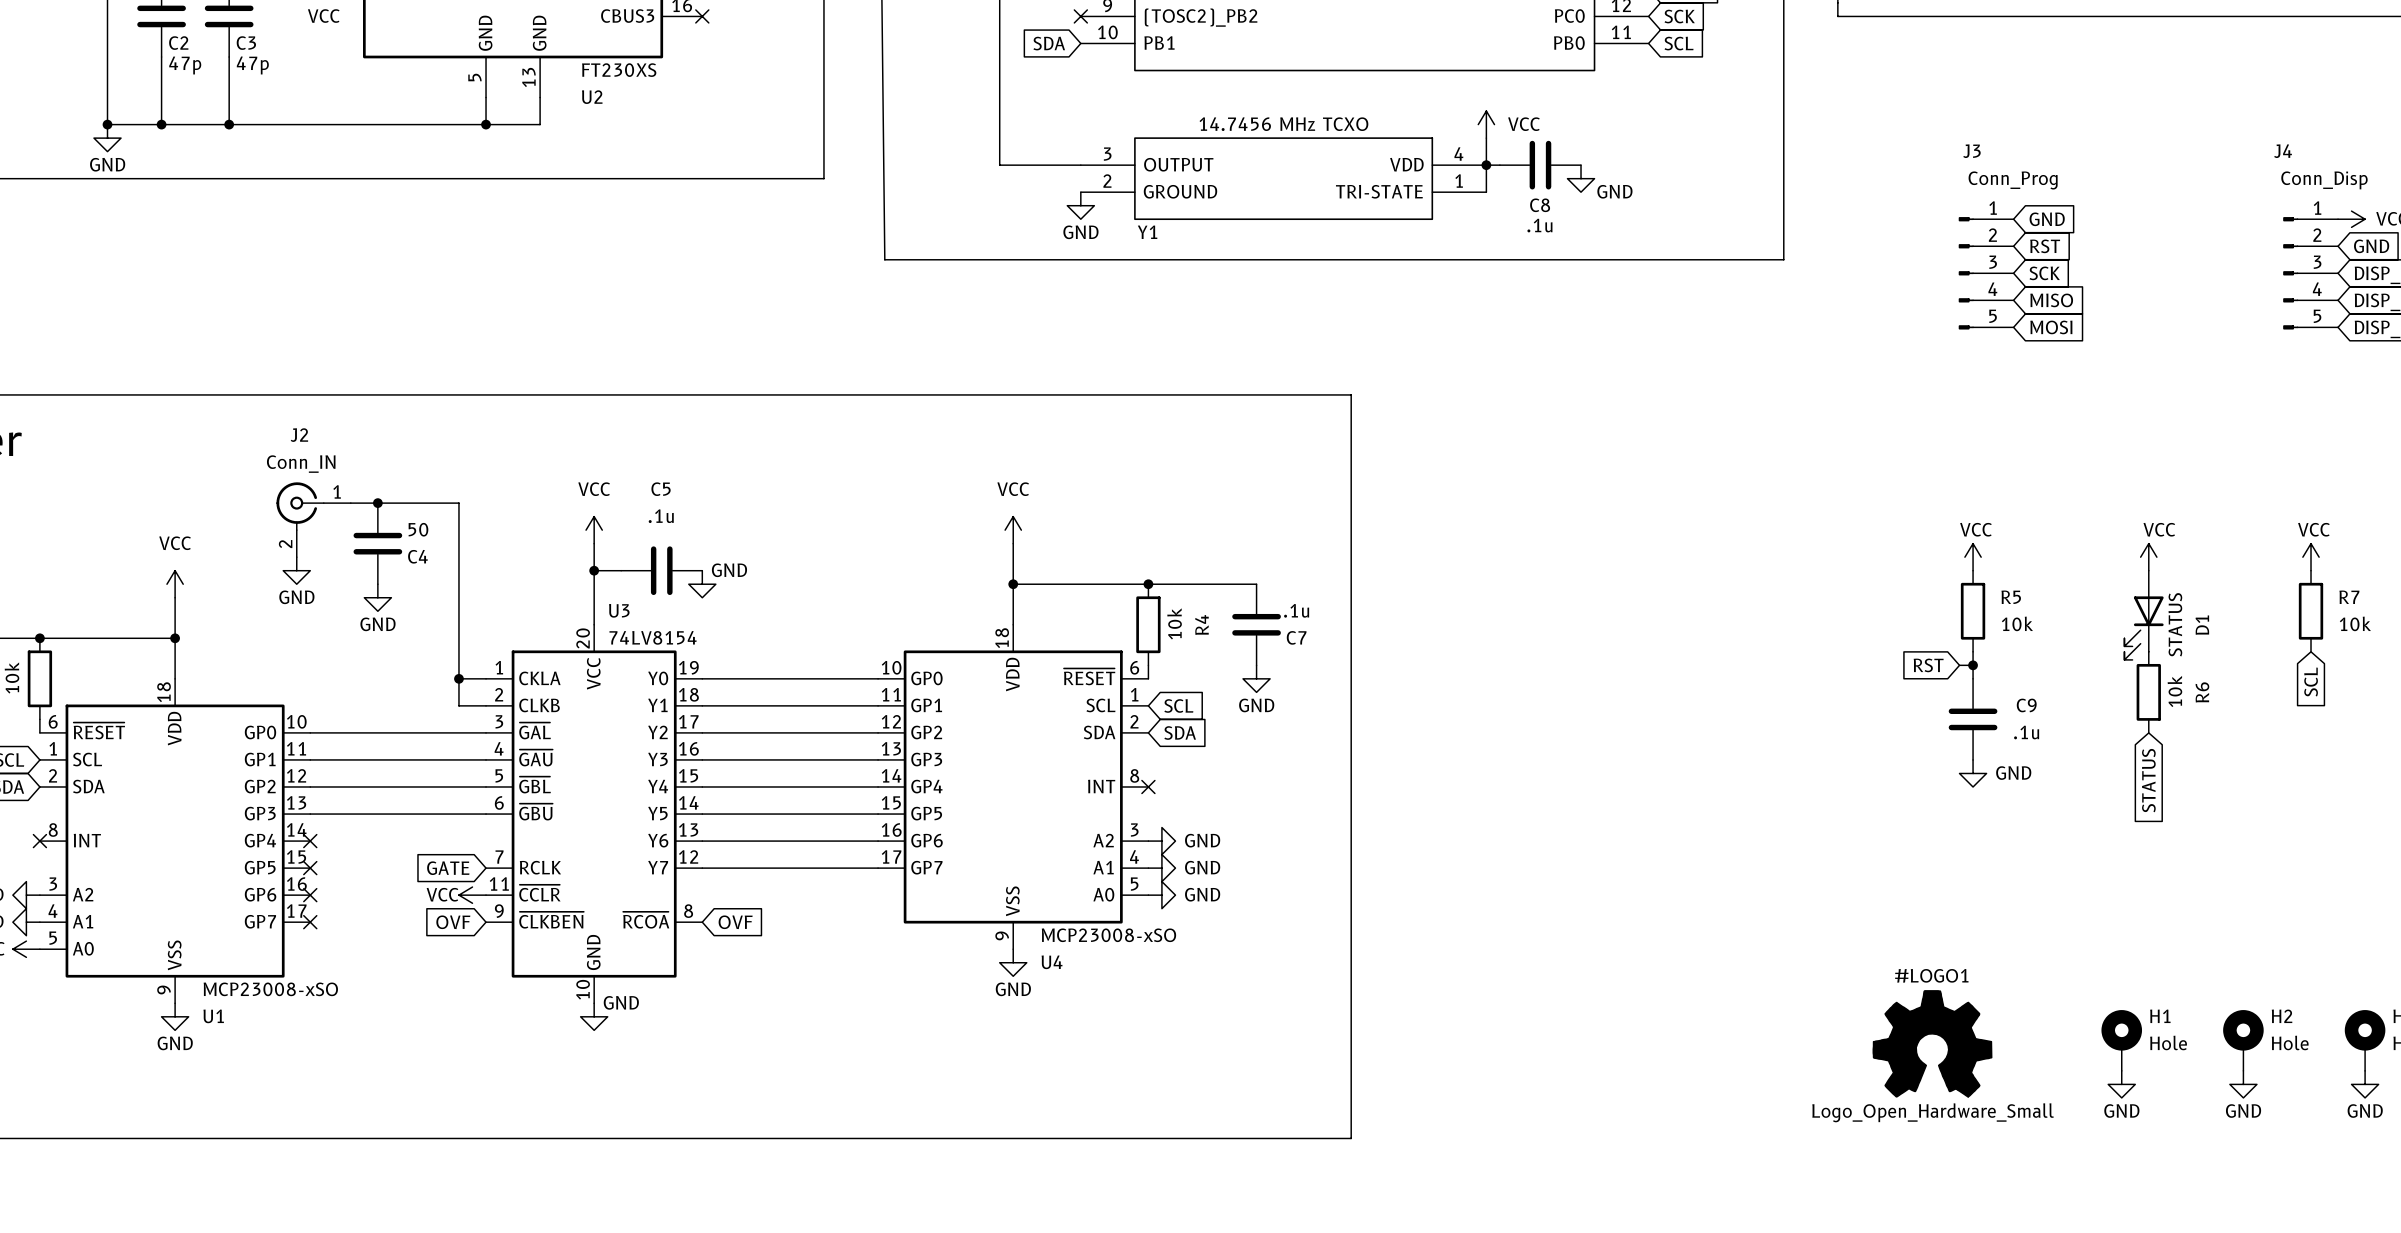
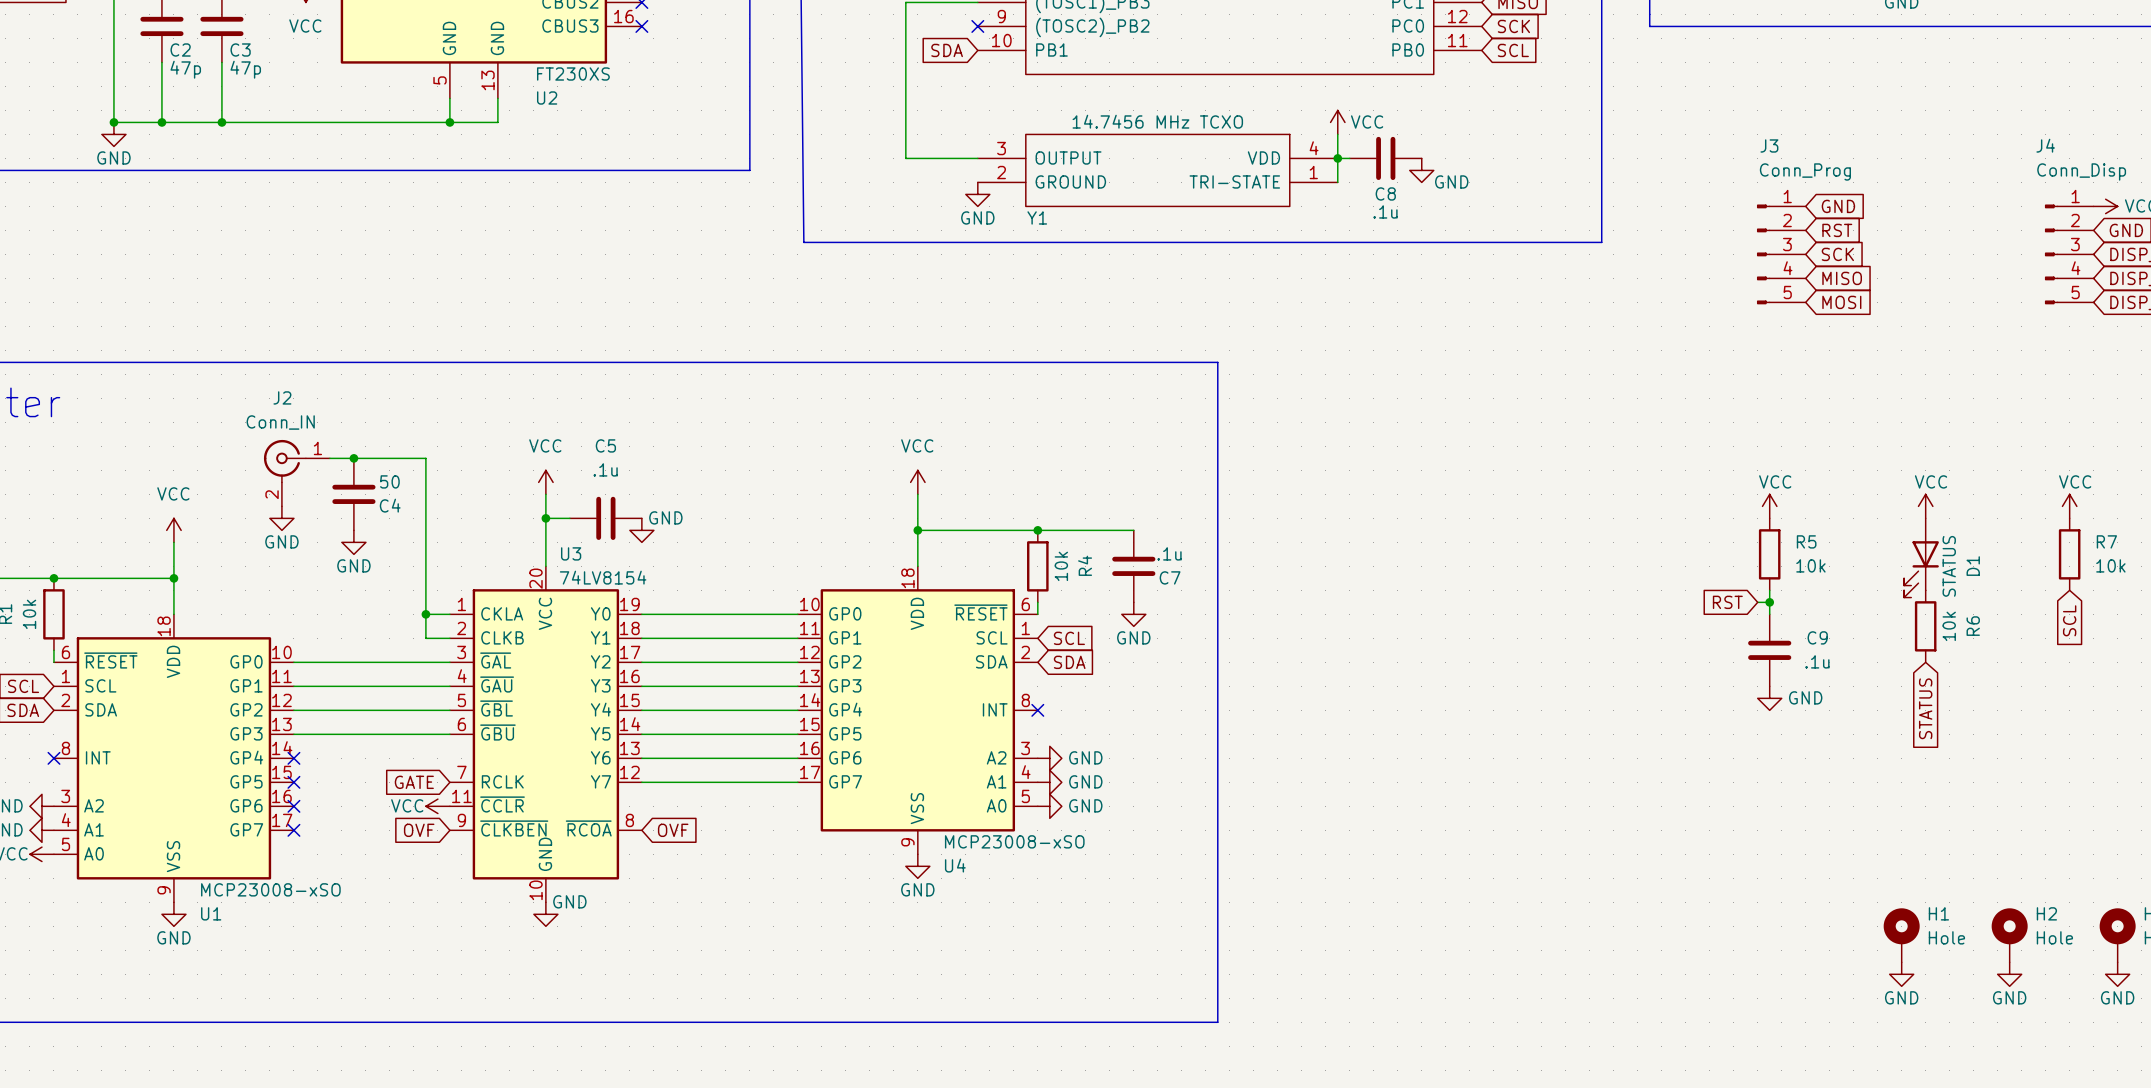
#LOGO1: Logo_Open_Hardware_Small (1932, 1043) -> none

